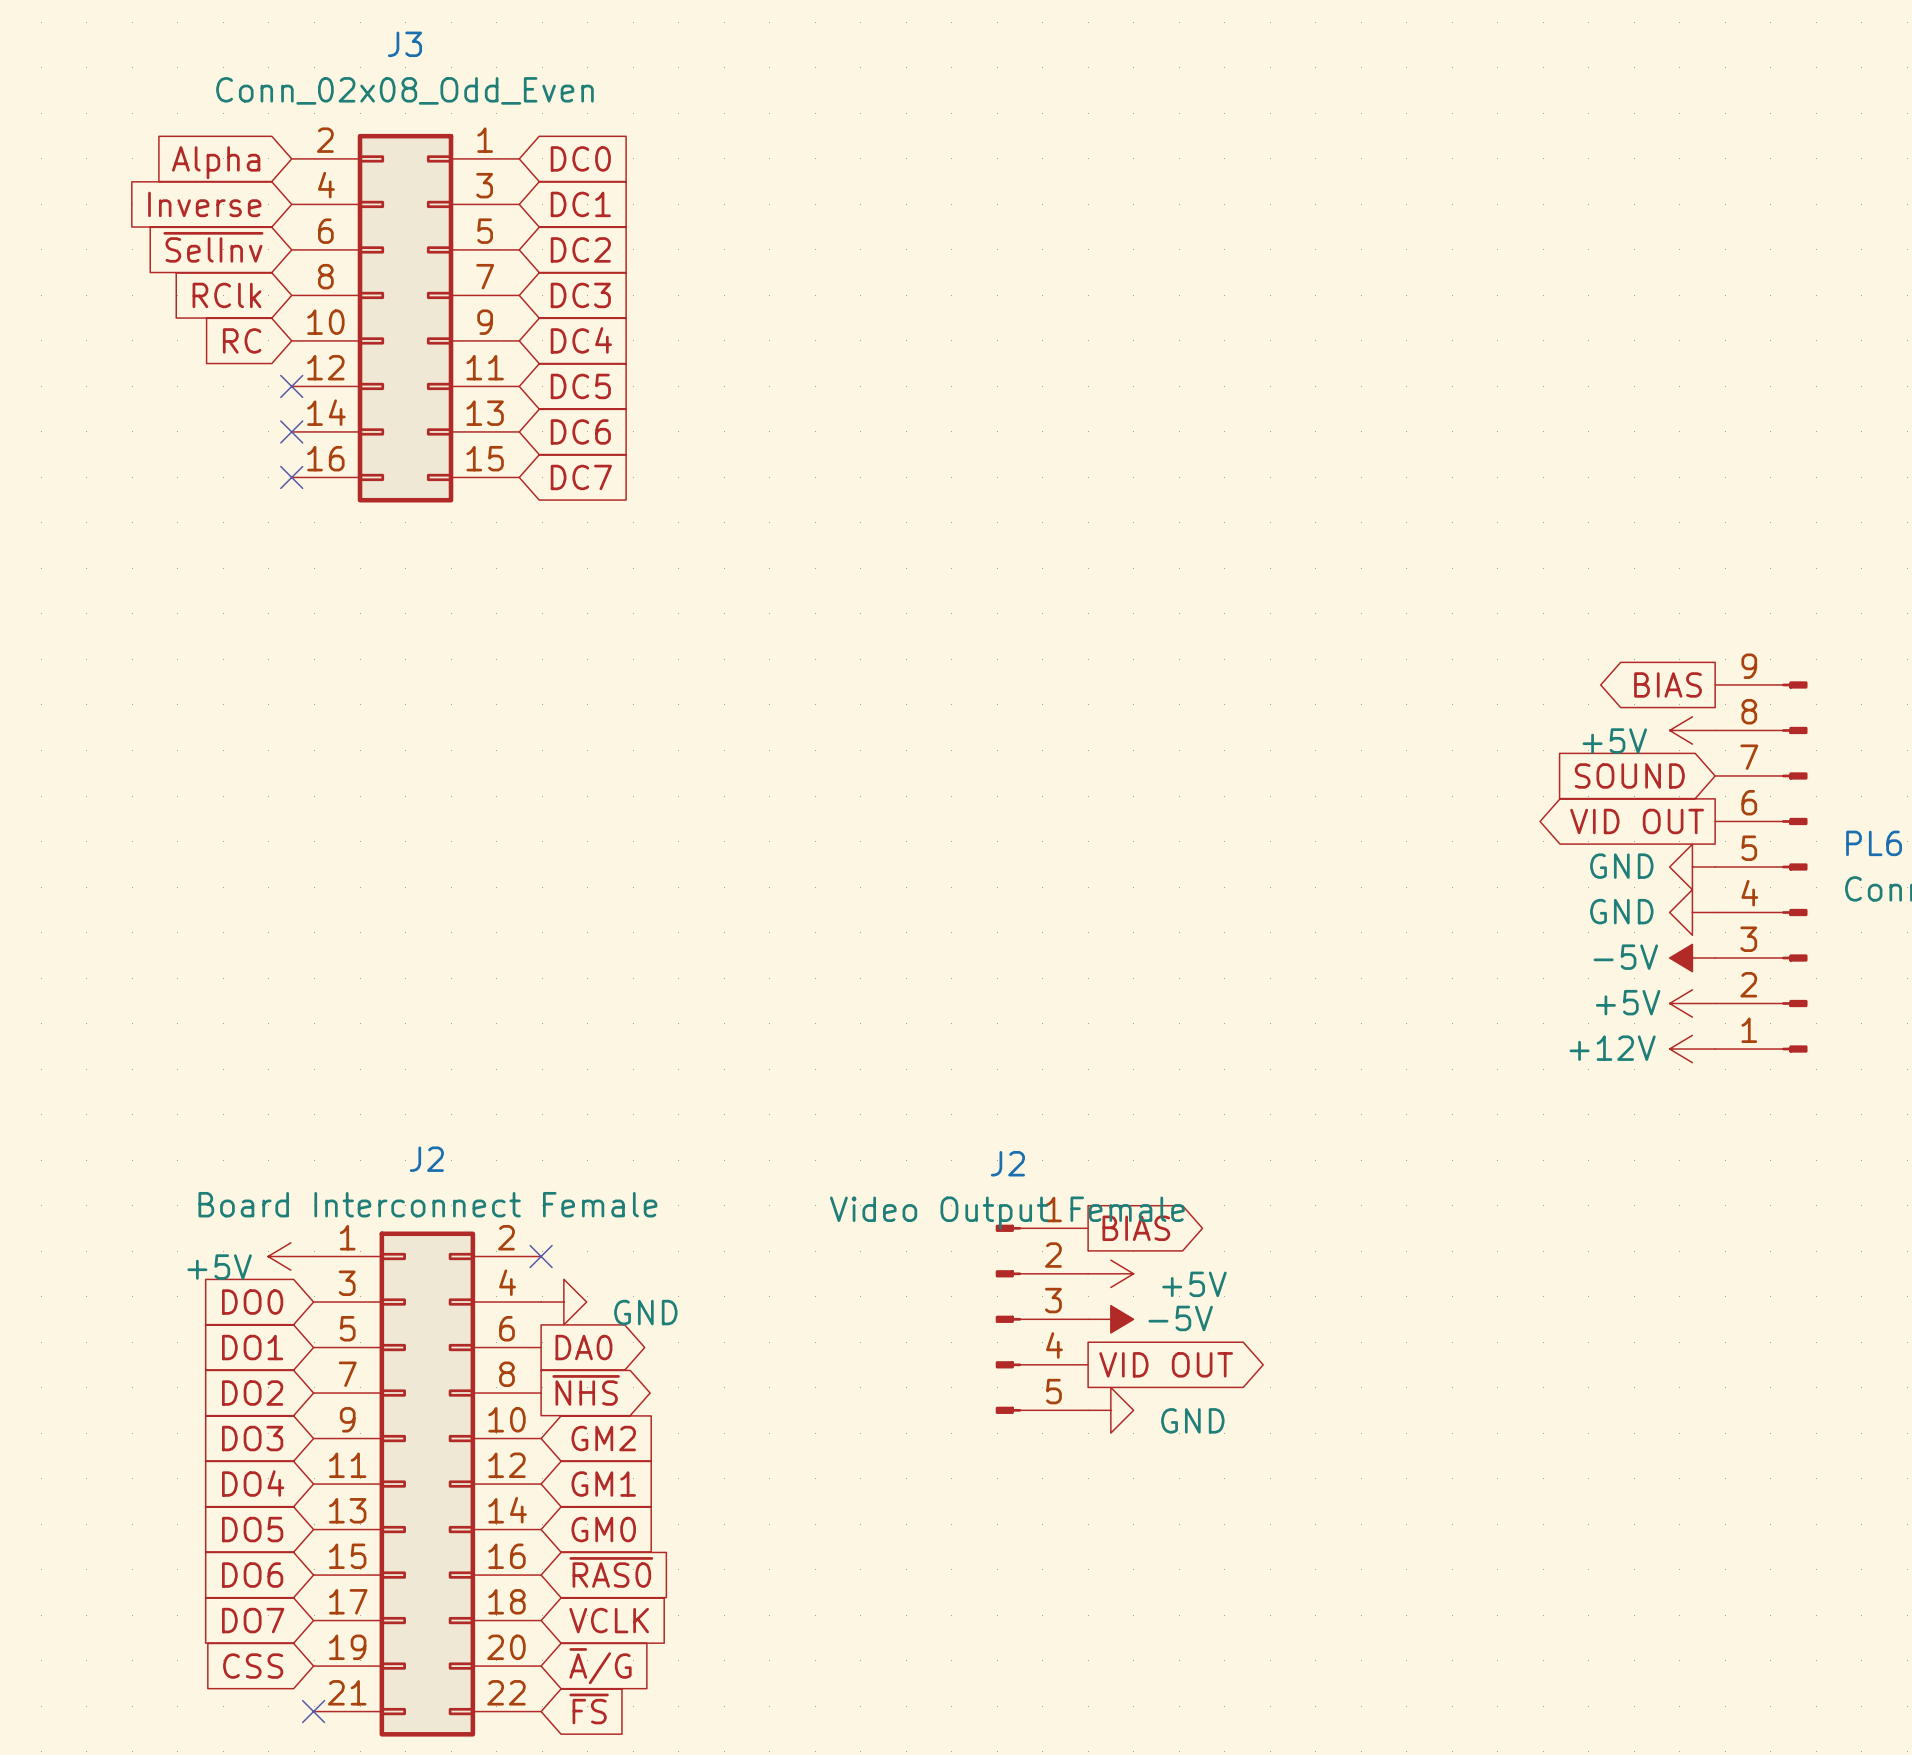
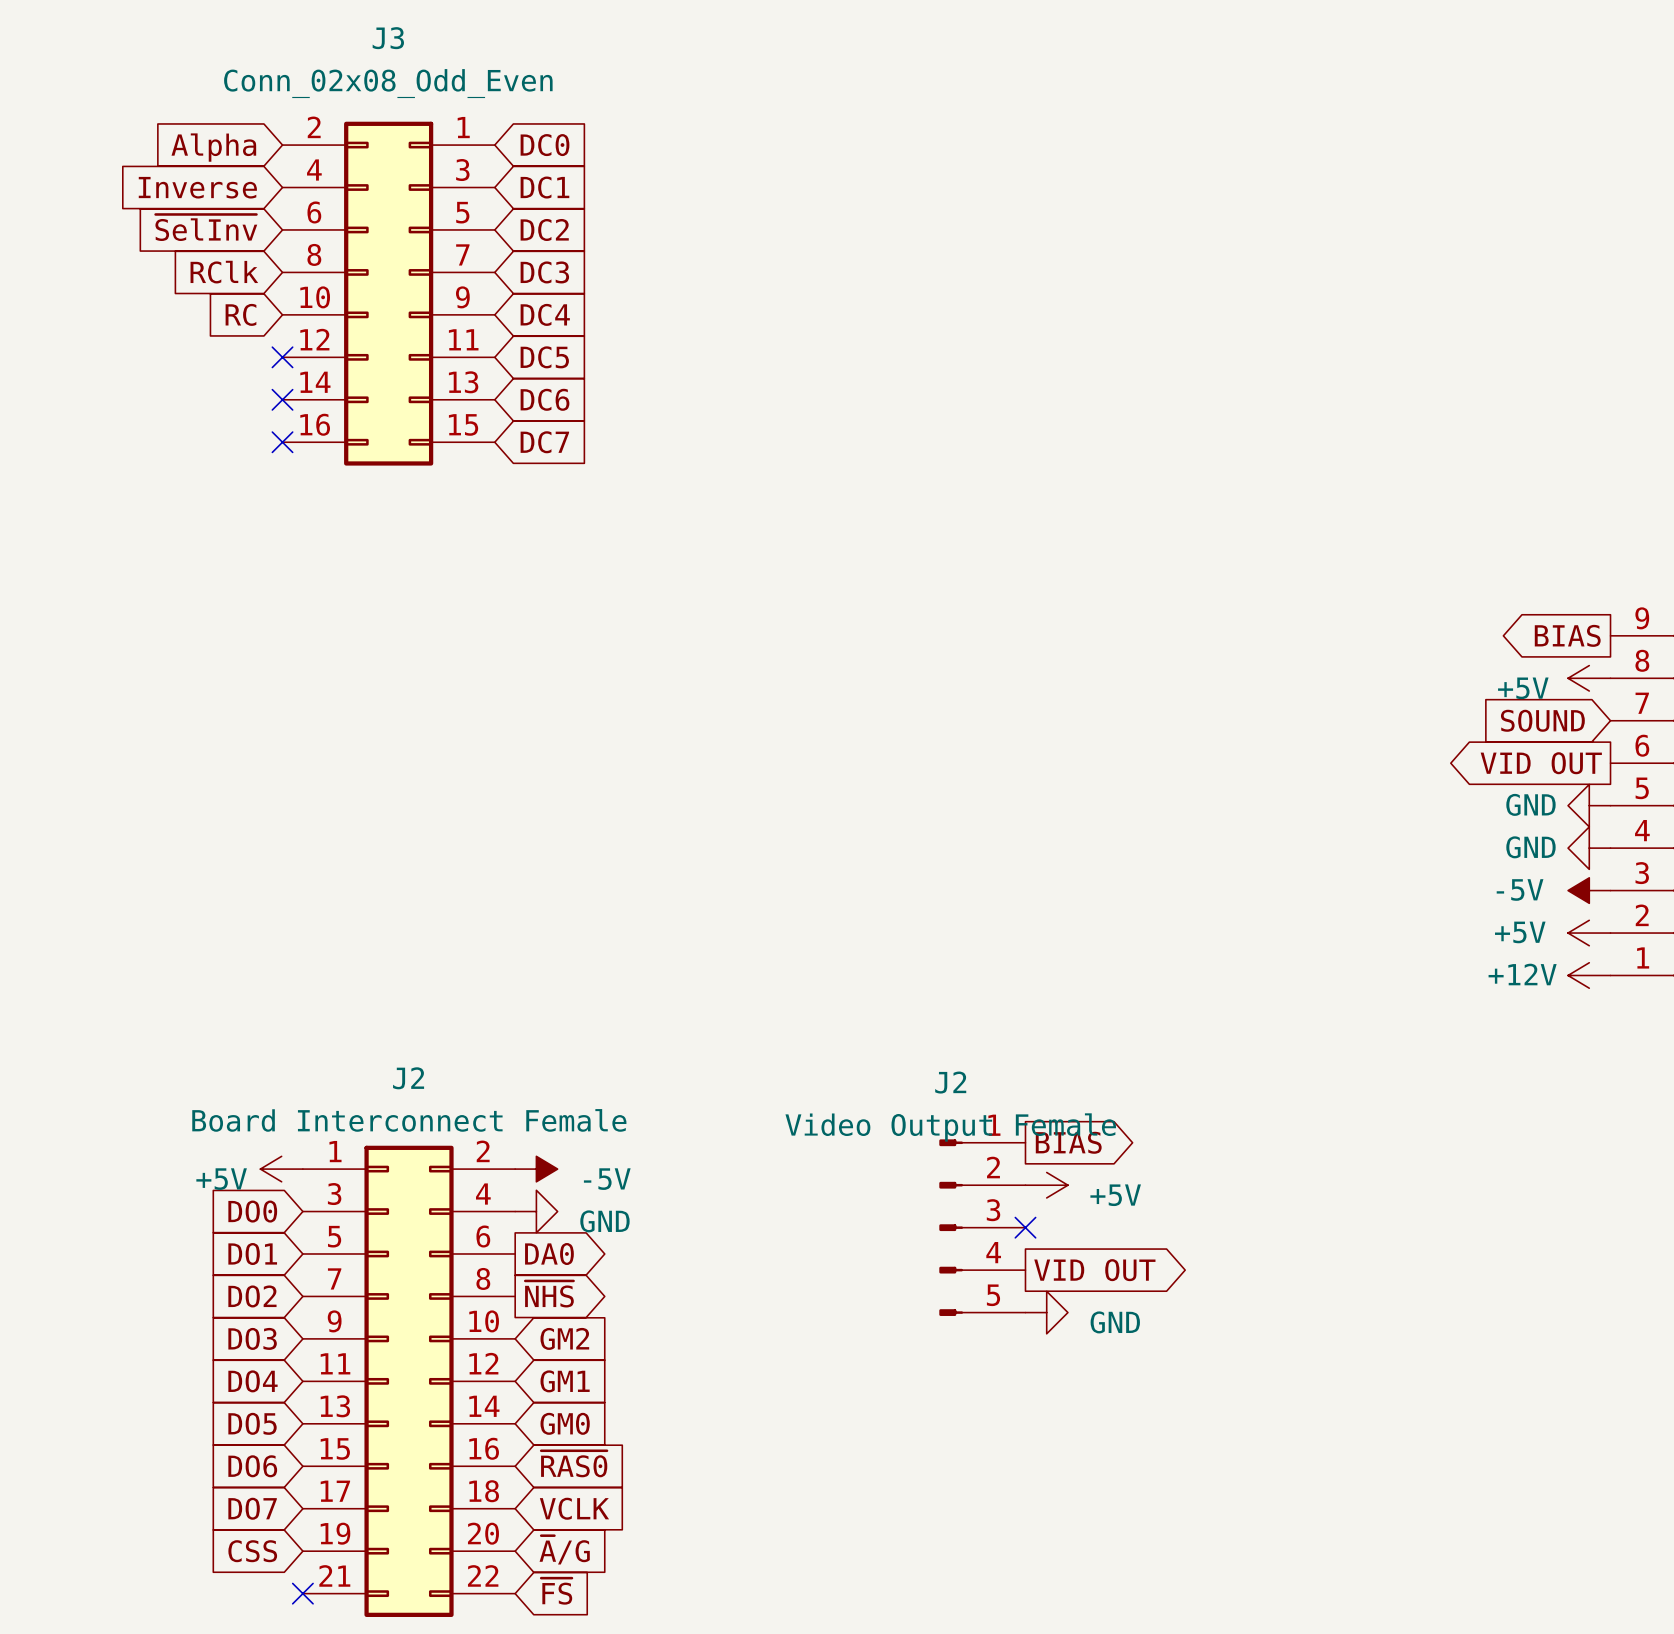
no-connect mark: (541, 1256) -> none
power symbol: none -> -5V (536, 1169)
no-connect mark: none -> (1025, 1227)
power symbol: -5V (1110, 1319) -> none

